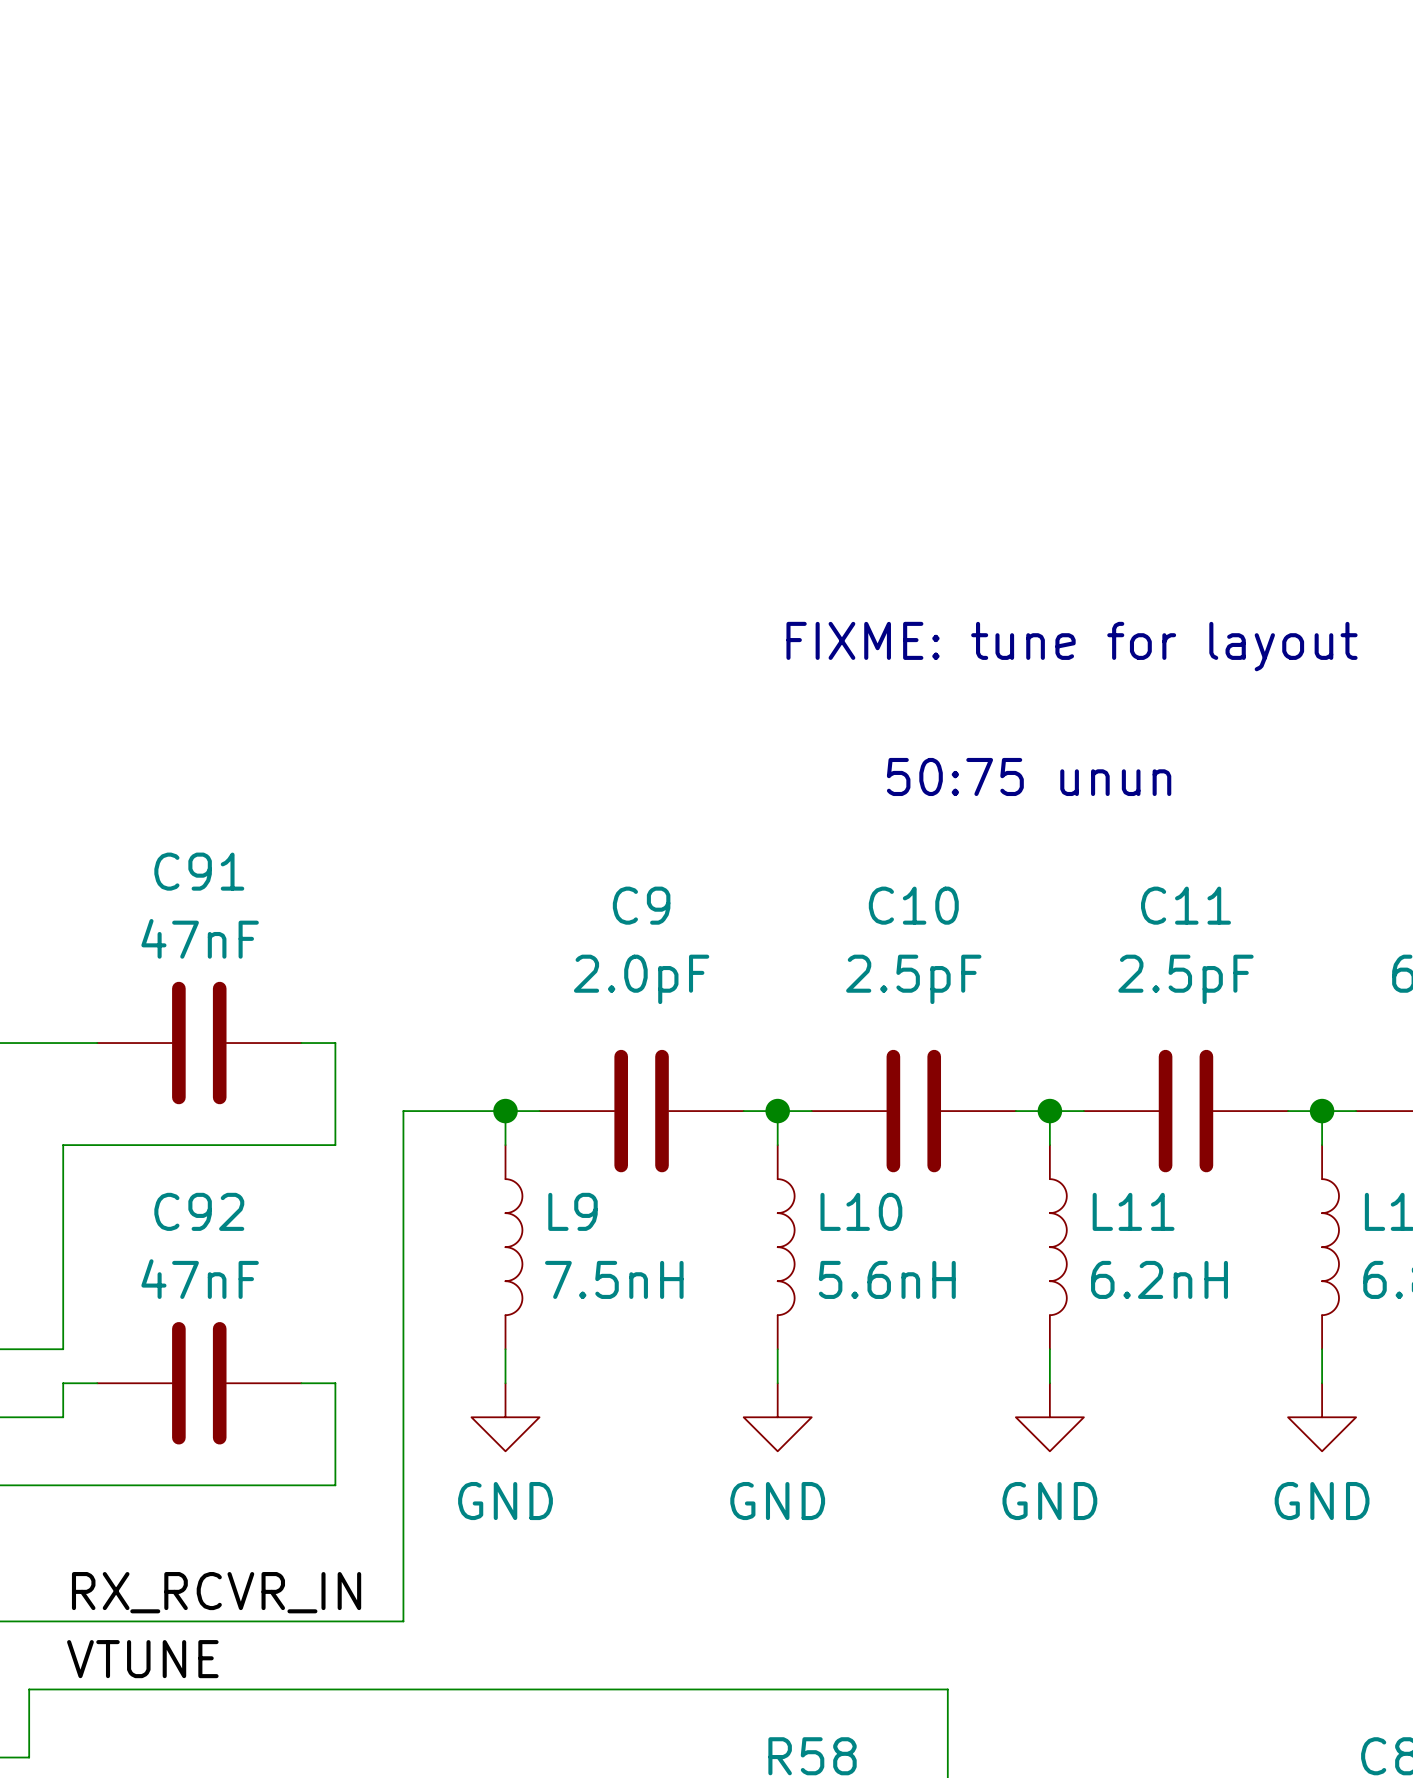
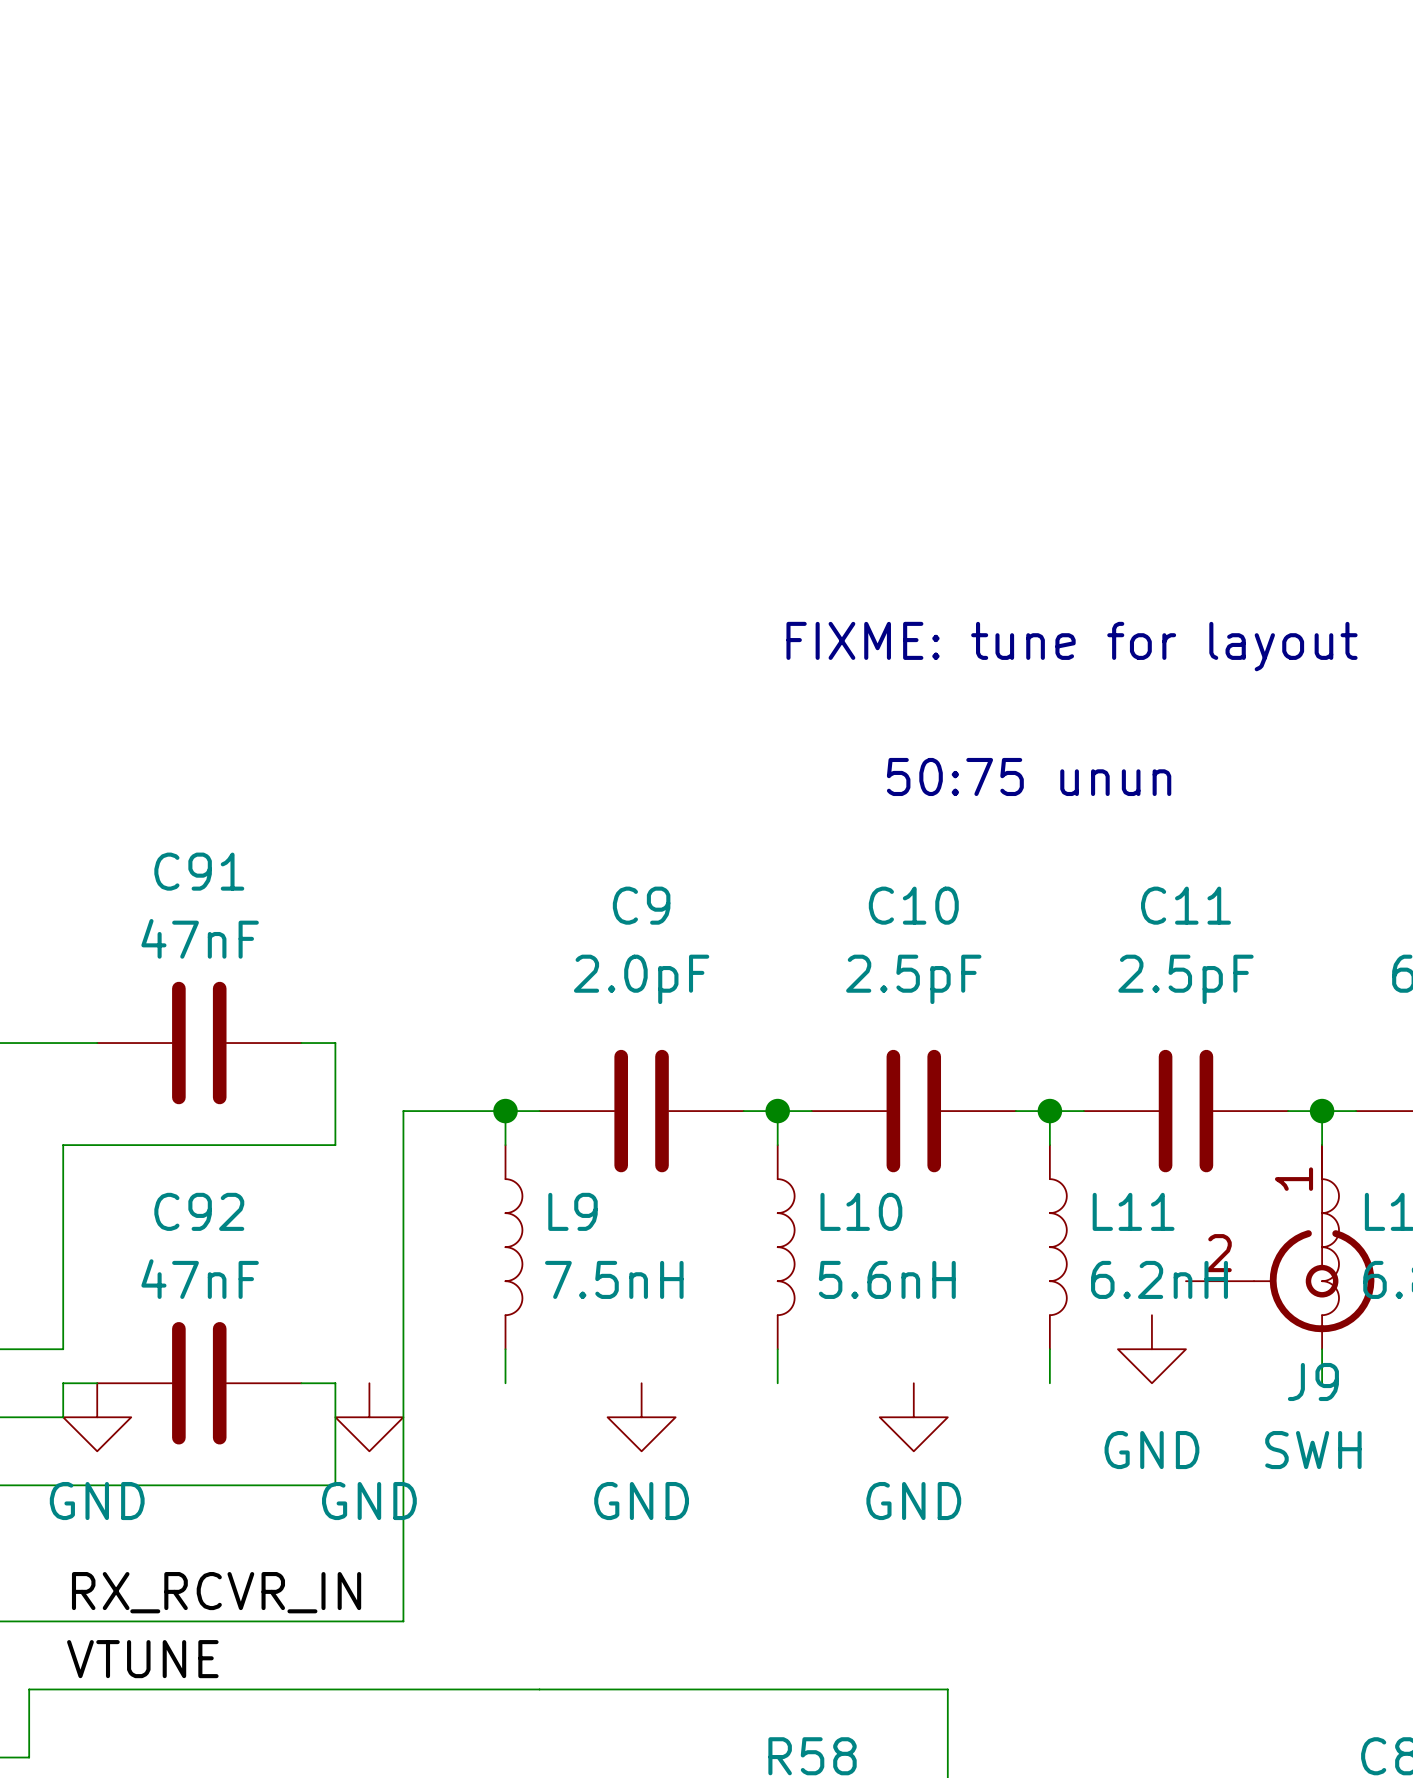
J9: none -> SWH (1280, 1238)
power symbol: none -> GND (1151, 1349)
power symbol: none -> GND (97, 1417)
power symbol: none -> GND (369, 1417)
power symbol: GND (505, 1417) -> none
power symbol: none -> GND (641, 1417)
power symbol: GND (777, 1417) -> none
power symbol: none -> GND (913, 1417)
power symbol: GND (1049, 1417) -> none
power symbol: GND (1322, 1417) -> none

